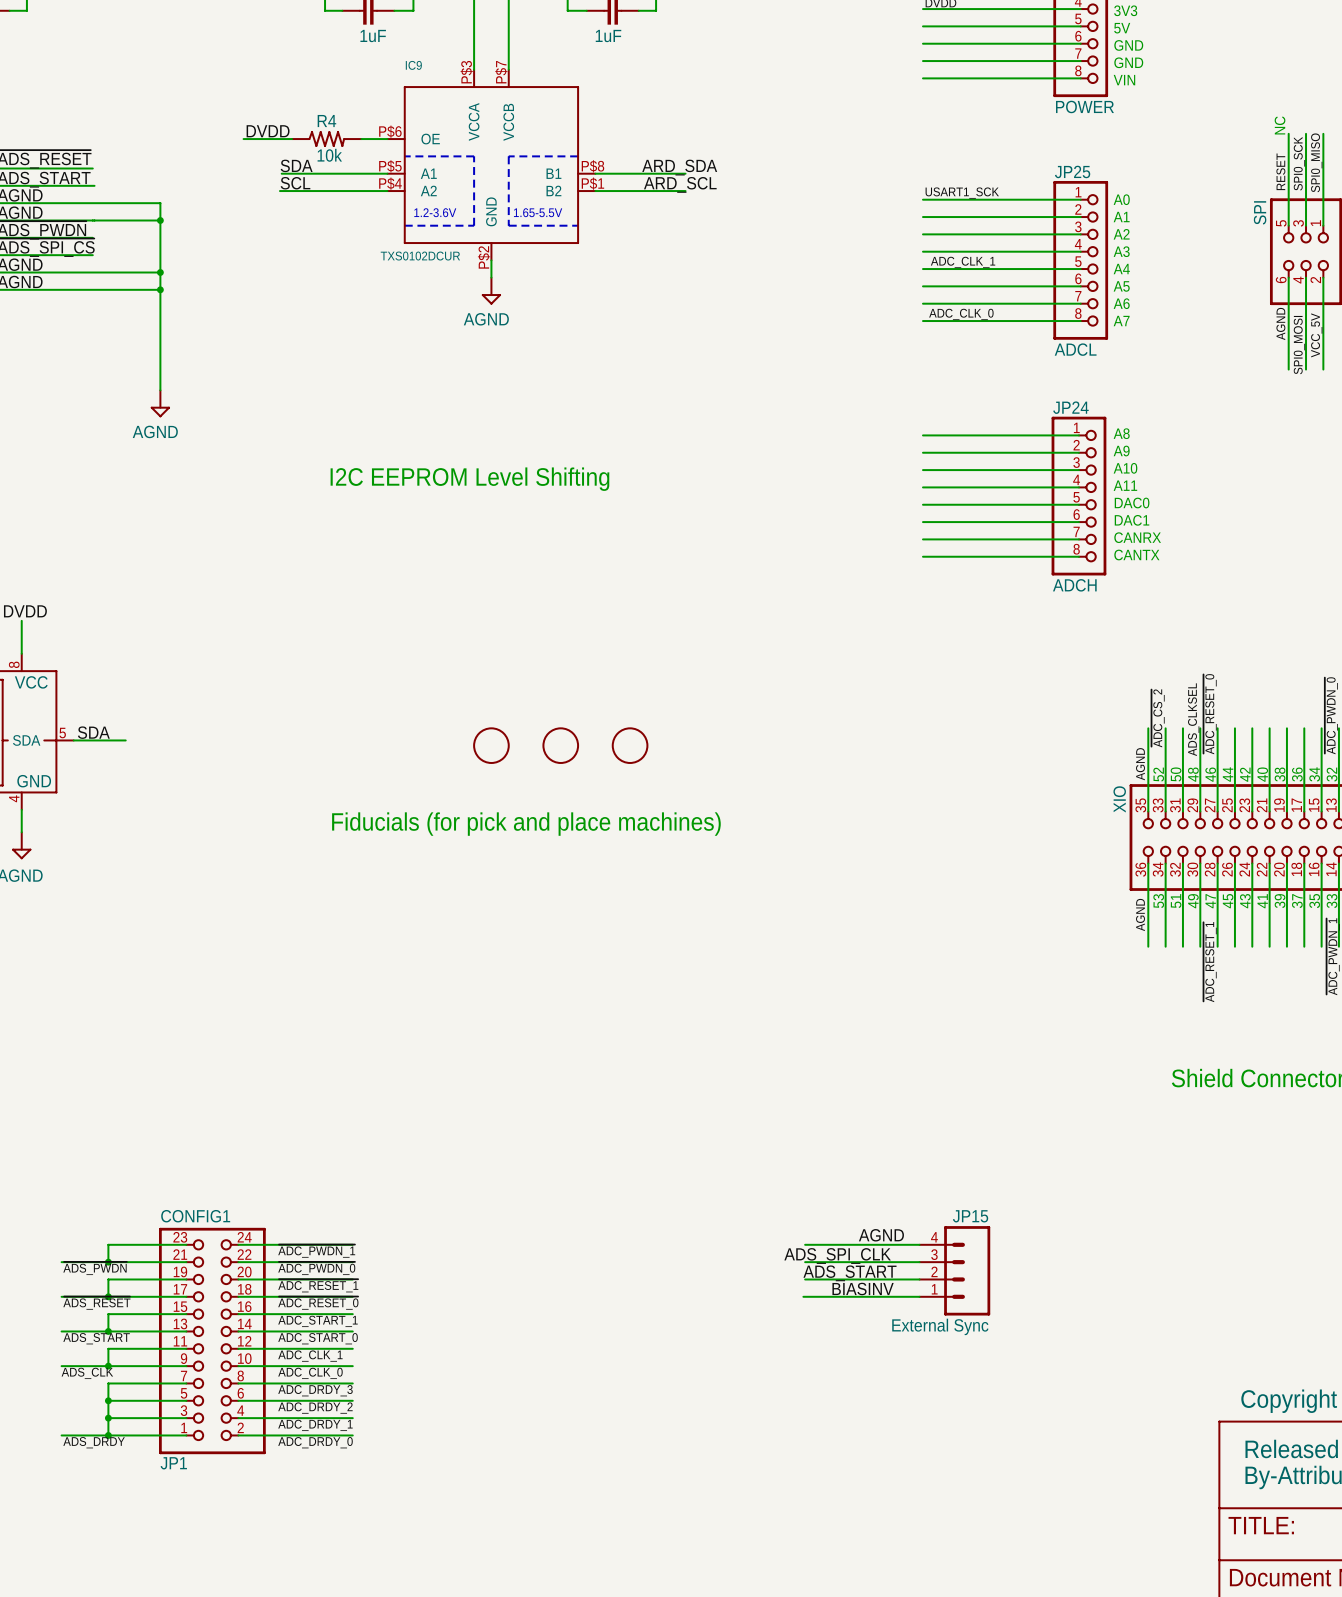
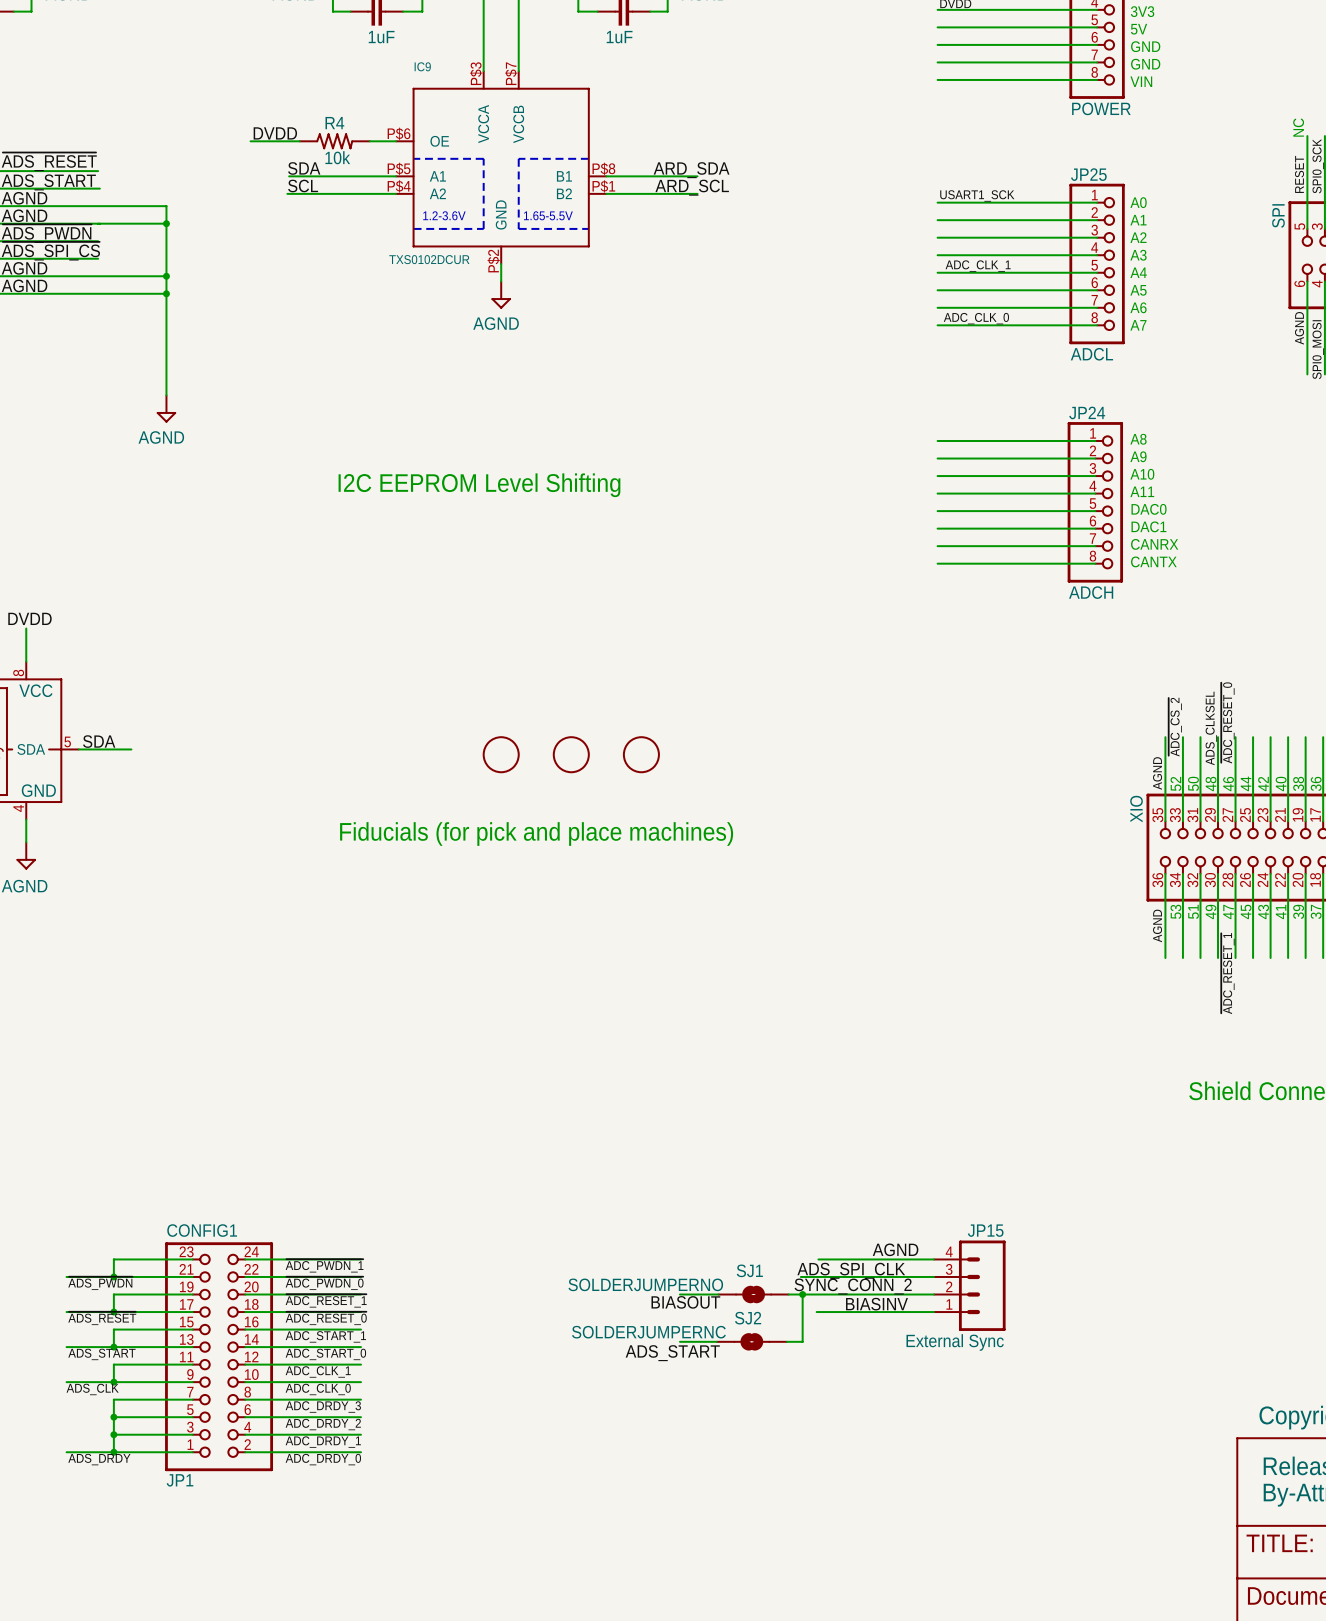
wire: none -> (800, 1276) (818, 1276)
label: none -> SYNC_CONN_2 (853, 1286)
label: ADS_START (849, 1273) -> none
wire: none -> (679, 1294) (718, 1294)
SJ1: none -> SOLDERJUMPERNO (753, 1294)
wire: none -> (788, 1294) (818, 1294)
wire: none -> (802, 1294) (802, 1341) (786, 1341)
junction: none -> (802, 1294)
label: none -> BIASOUT (685, 1302)
wire: none -> (679, 1341) (716, 1341)
SJ2: none -> SOLDERJUMPERNC (751, 1341)
label: none -> ADS_START (672, 1353)

